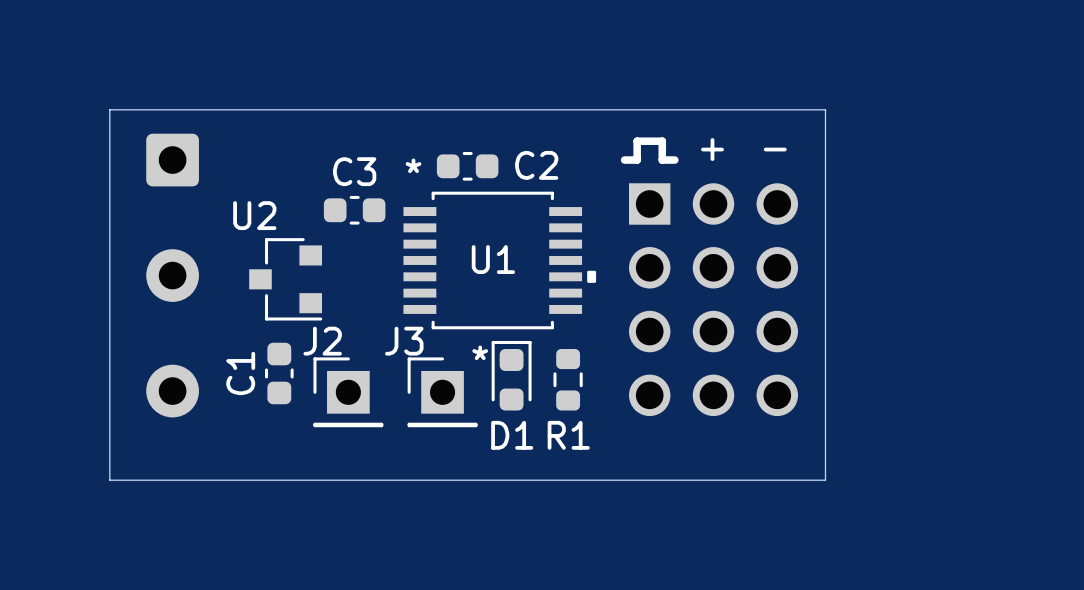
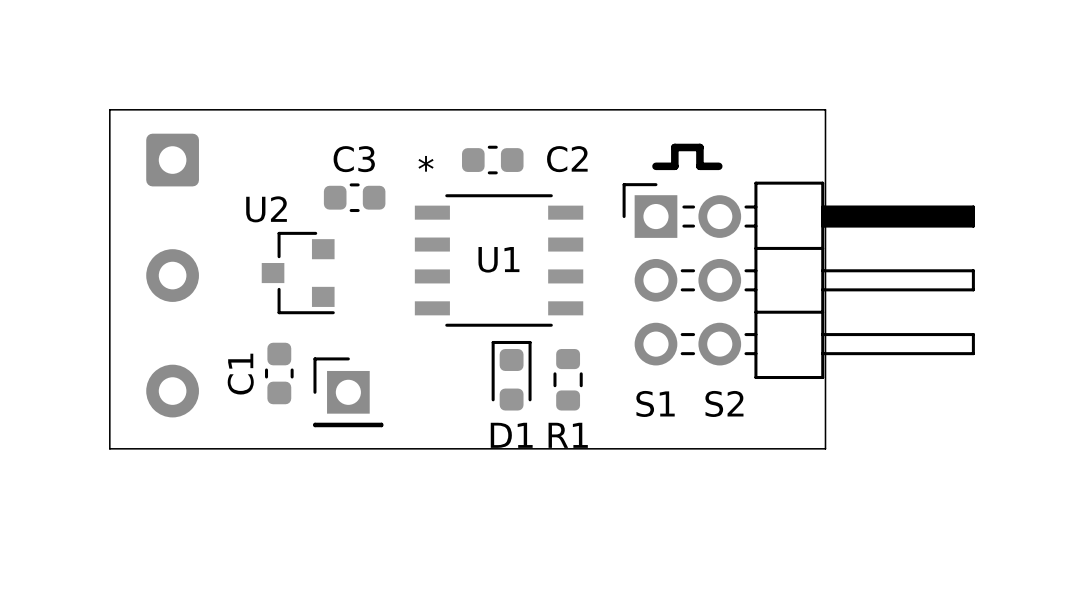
text: + (712, 149) -> none
text: - (775, 149) -> none
line: (624, 160) (637, 160) (637, 141) (662, 141) (662, 160) (674, 160) -> none
C2 name position: C2 (536, 165) -> C2 (567, 159)
C2 position: (467, 166) -> (492, 160)
line: none -> (655, 166) (674, 166) (674, 147) (699, 147) (699, 166) (718, 166)
U1 footprint: [403, 191, 597, 330] -> [414, 194, 584, 327]
C3 position: (354, 210) -> (354, 197)
U2 position: (285, 279) -> (298, 273)
part: none -> (798, 280)
part: (713, 299) -> none
J2 name: J2 (322, 341) -> none
text: * (480, 352) -> none
J3: (442, 392) -> none
text: none -> S1 (655, 403)
text: none -> S2 (724, 403)
board edge: (109, 448) (109, 480) (825, 480) (825, 448) -> (109, 448) (825, 448)

